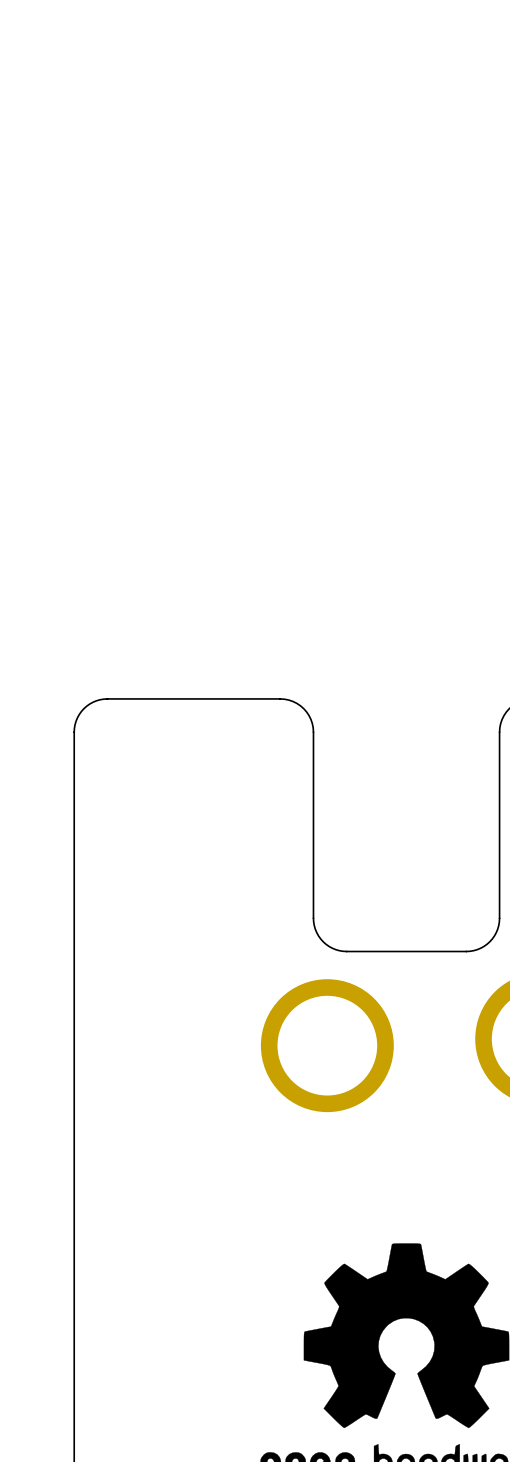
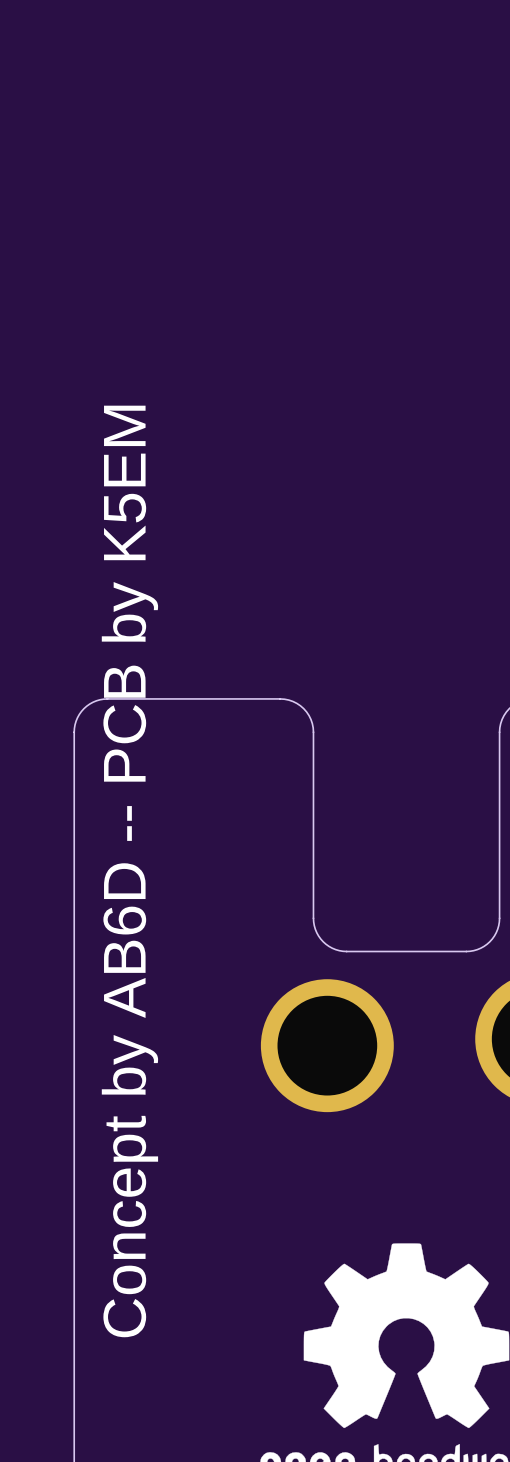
text: none -> Concept by AB6D -- PCB by K5EM (129, 871)

